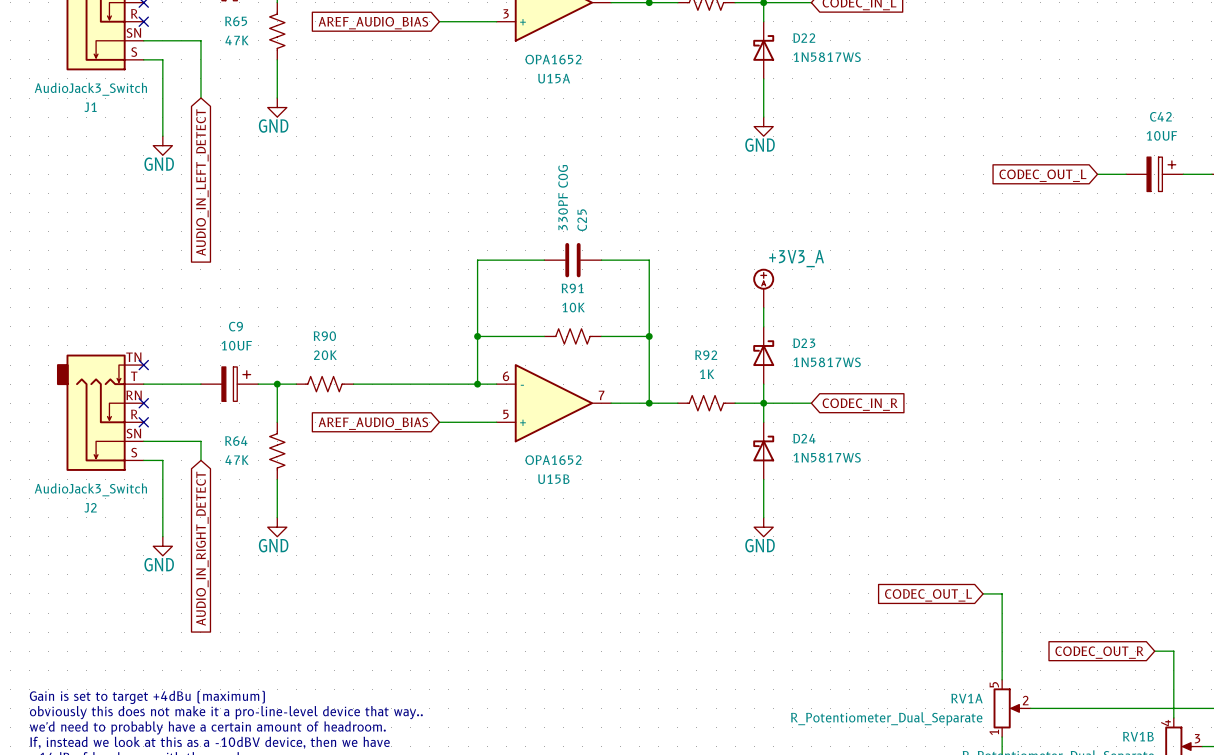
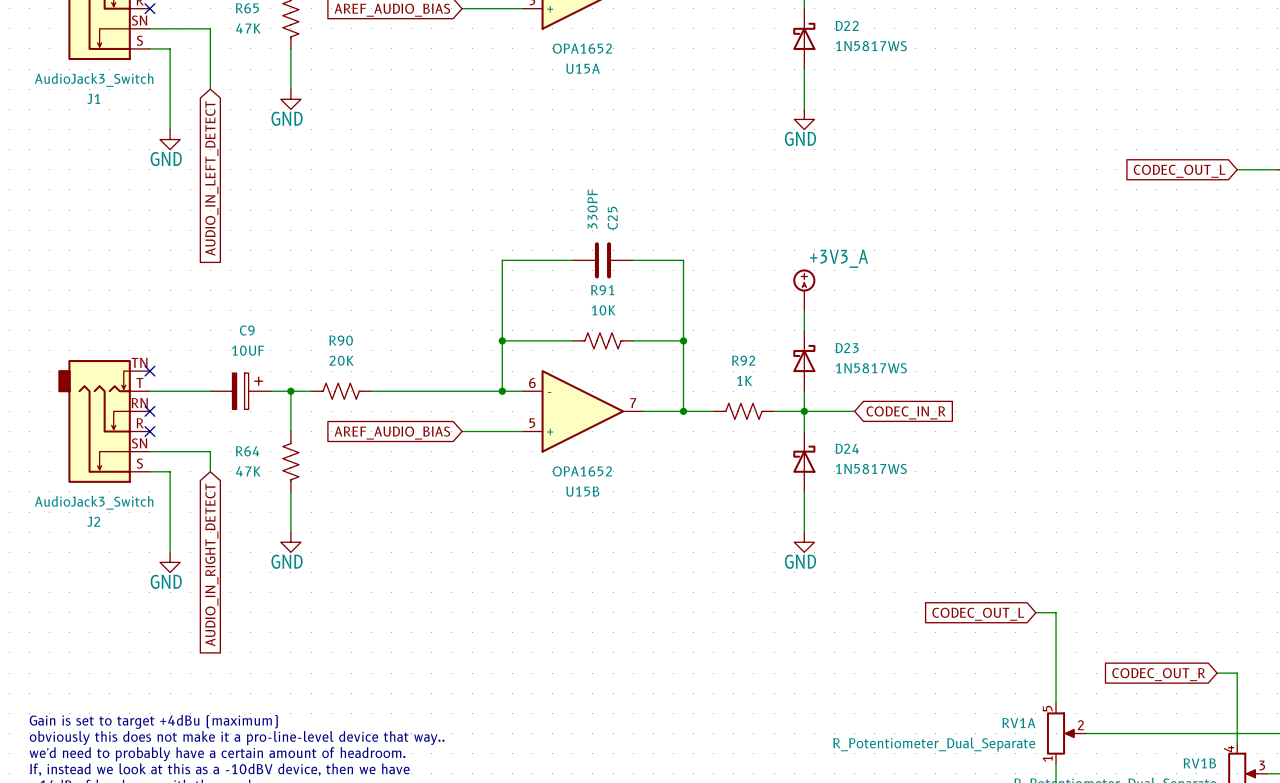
wire: (1097, 174) (1126, 174) -> none
C42: 10UF (1154, 174) -> none
global label position: CODEC_OUT_L (1042, 175) -> CODEC_OUT_L (1179, 171)
C25 value: 330PF C0G (563, 197) -> 330PF (592, 209)

